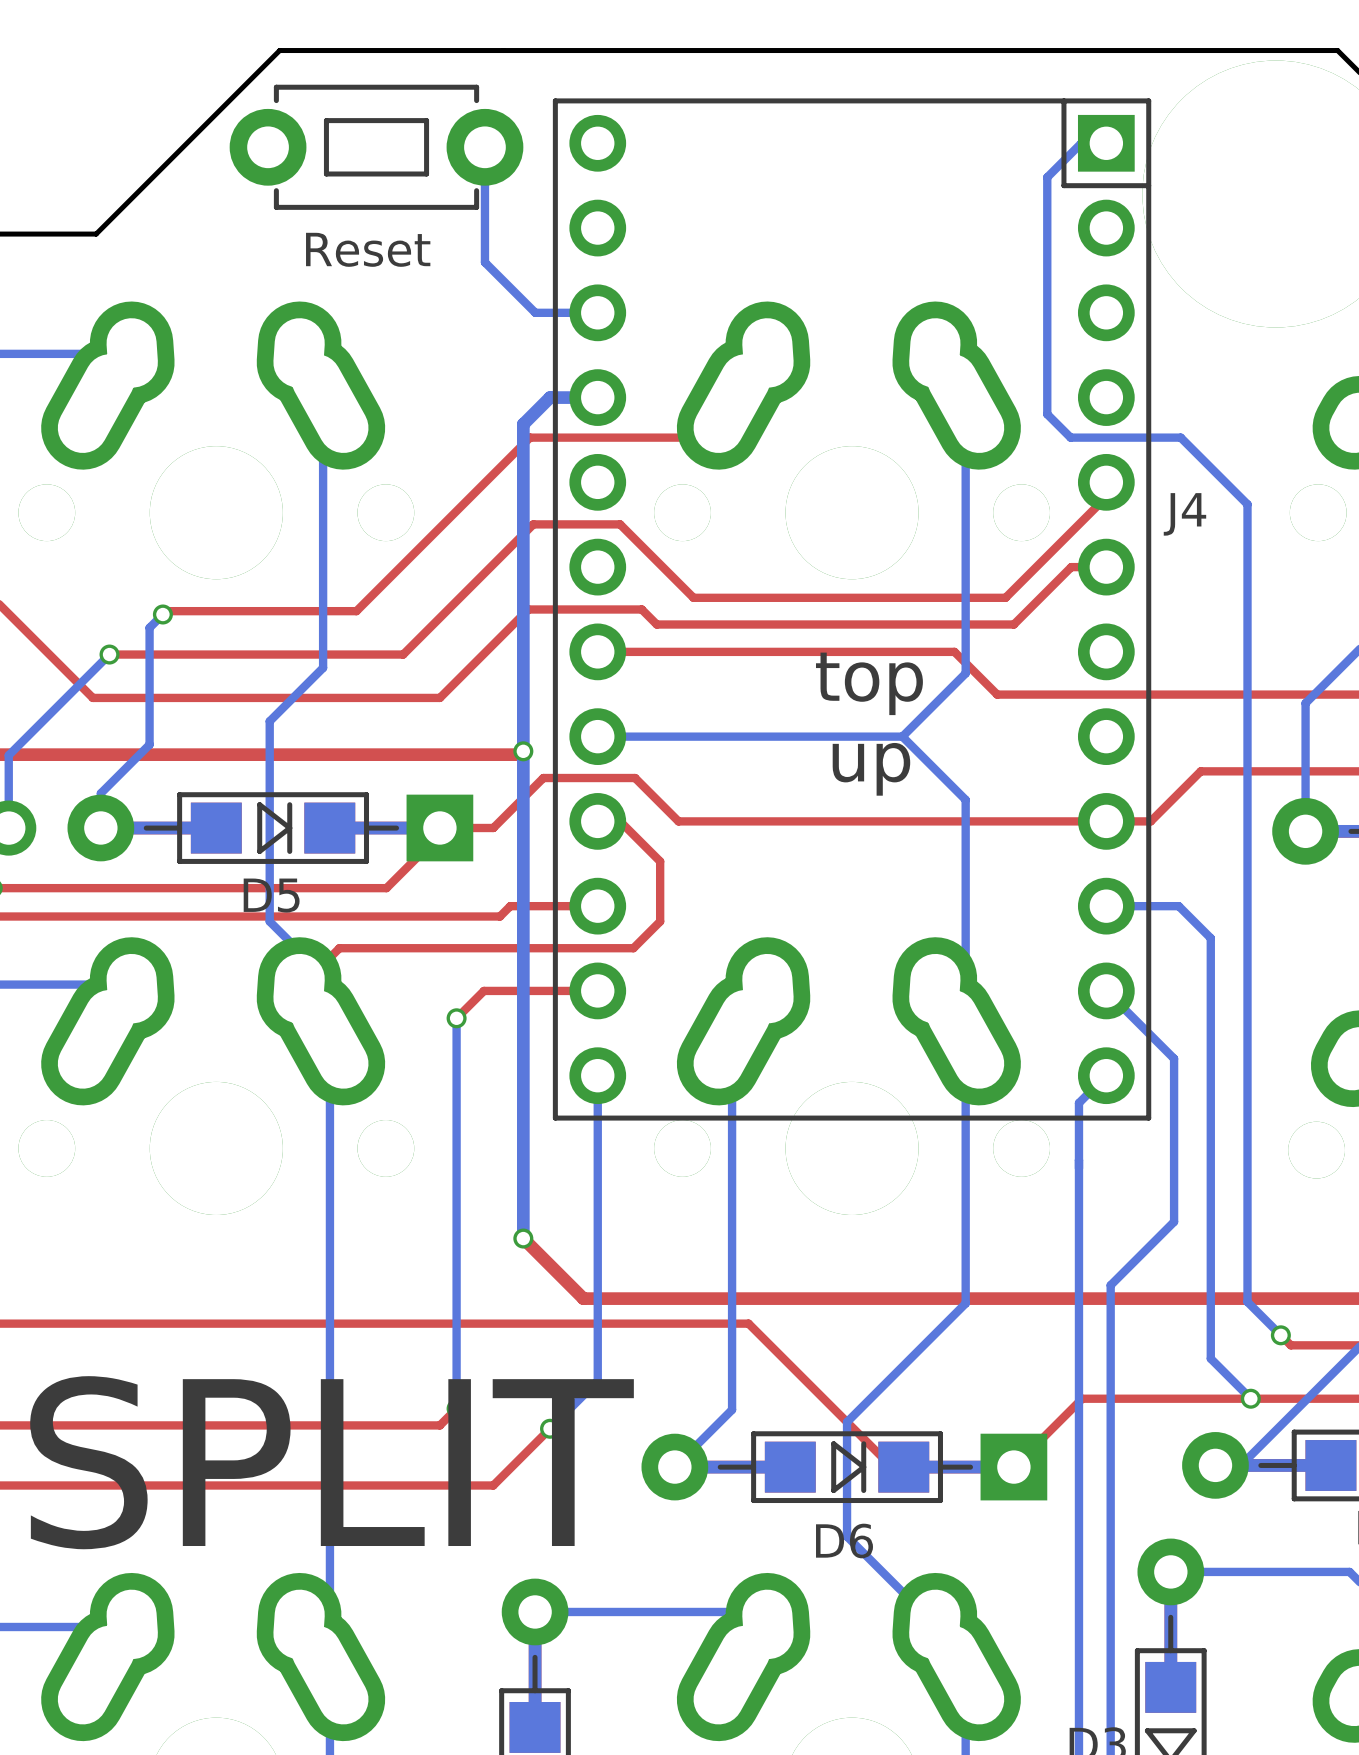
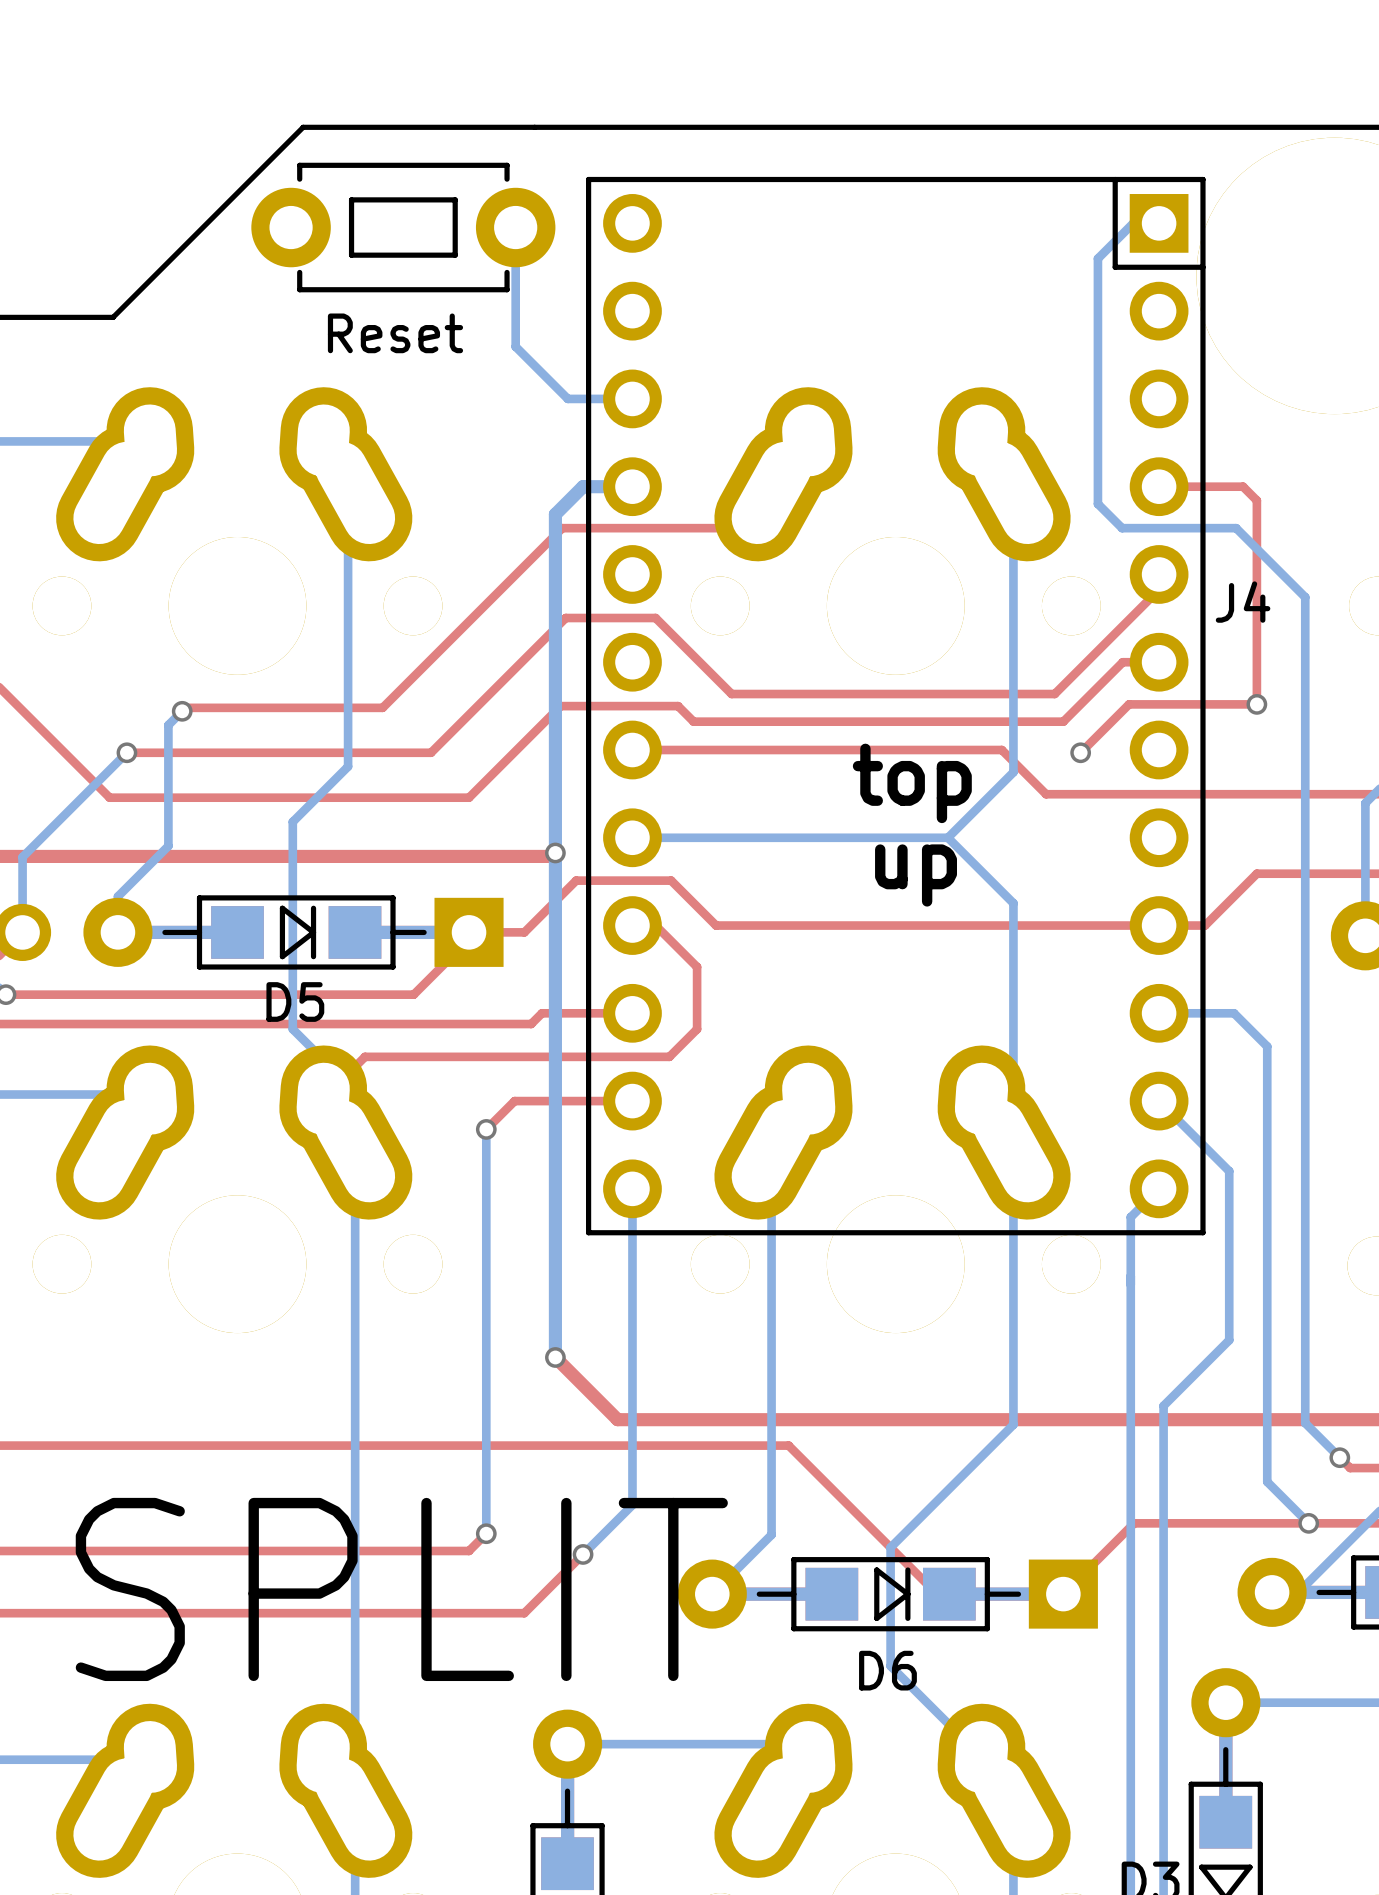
top track: none -> (1159, 486) (1243, 486) (1256, 500) (1256, 704) (1129, 704) (1080, 752)
via: none -> (1256, 704)
via: none -> (1080, 752)

